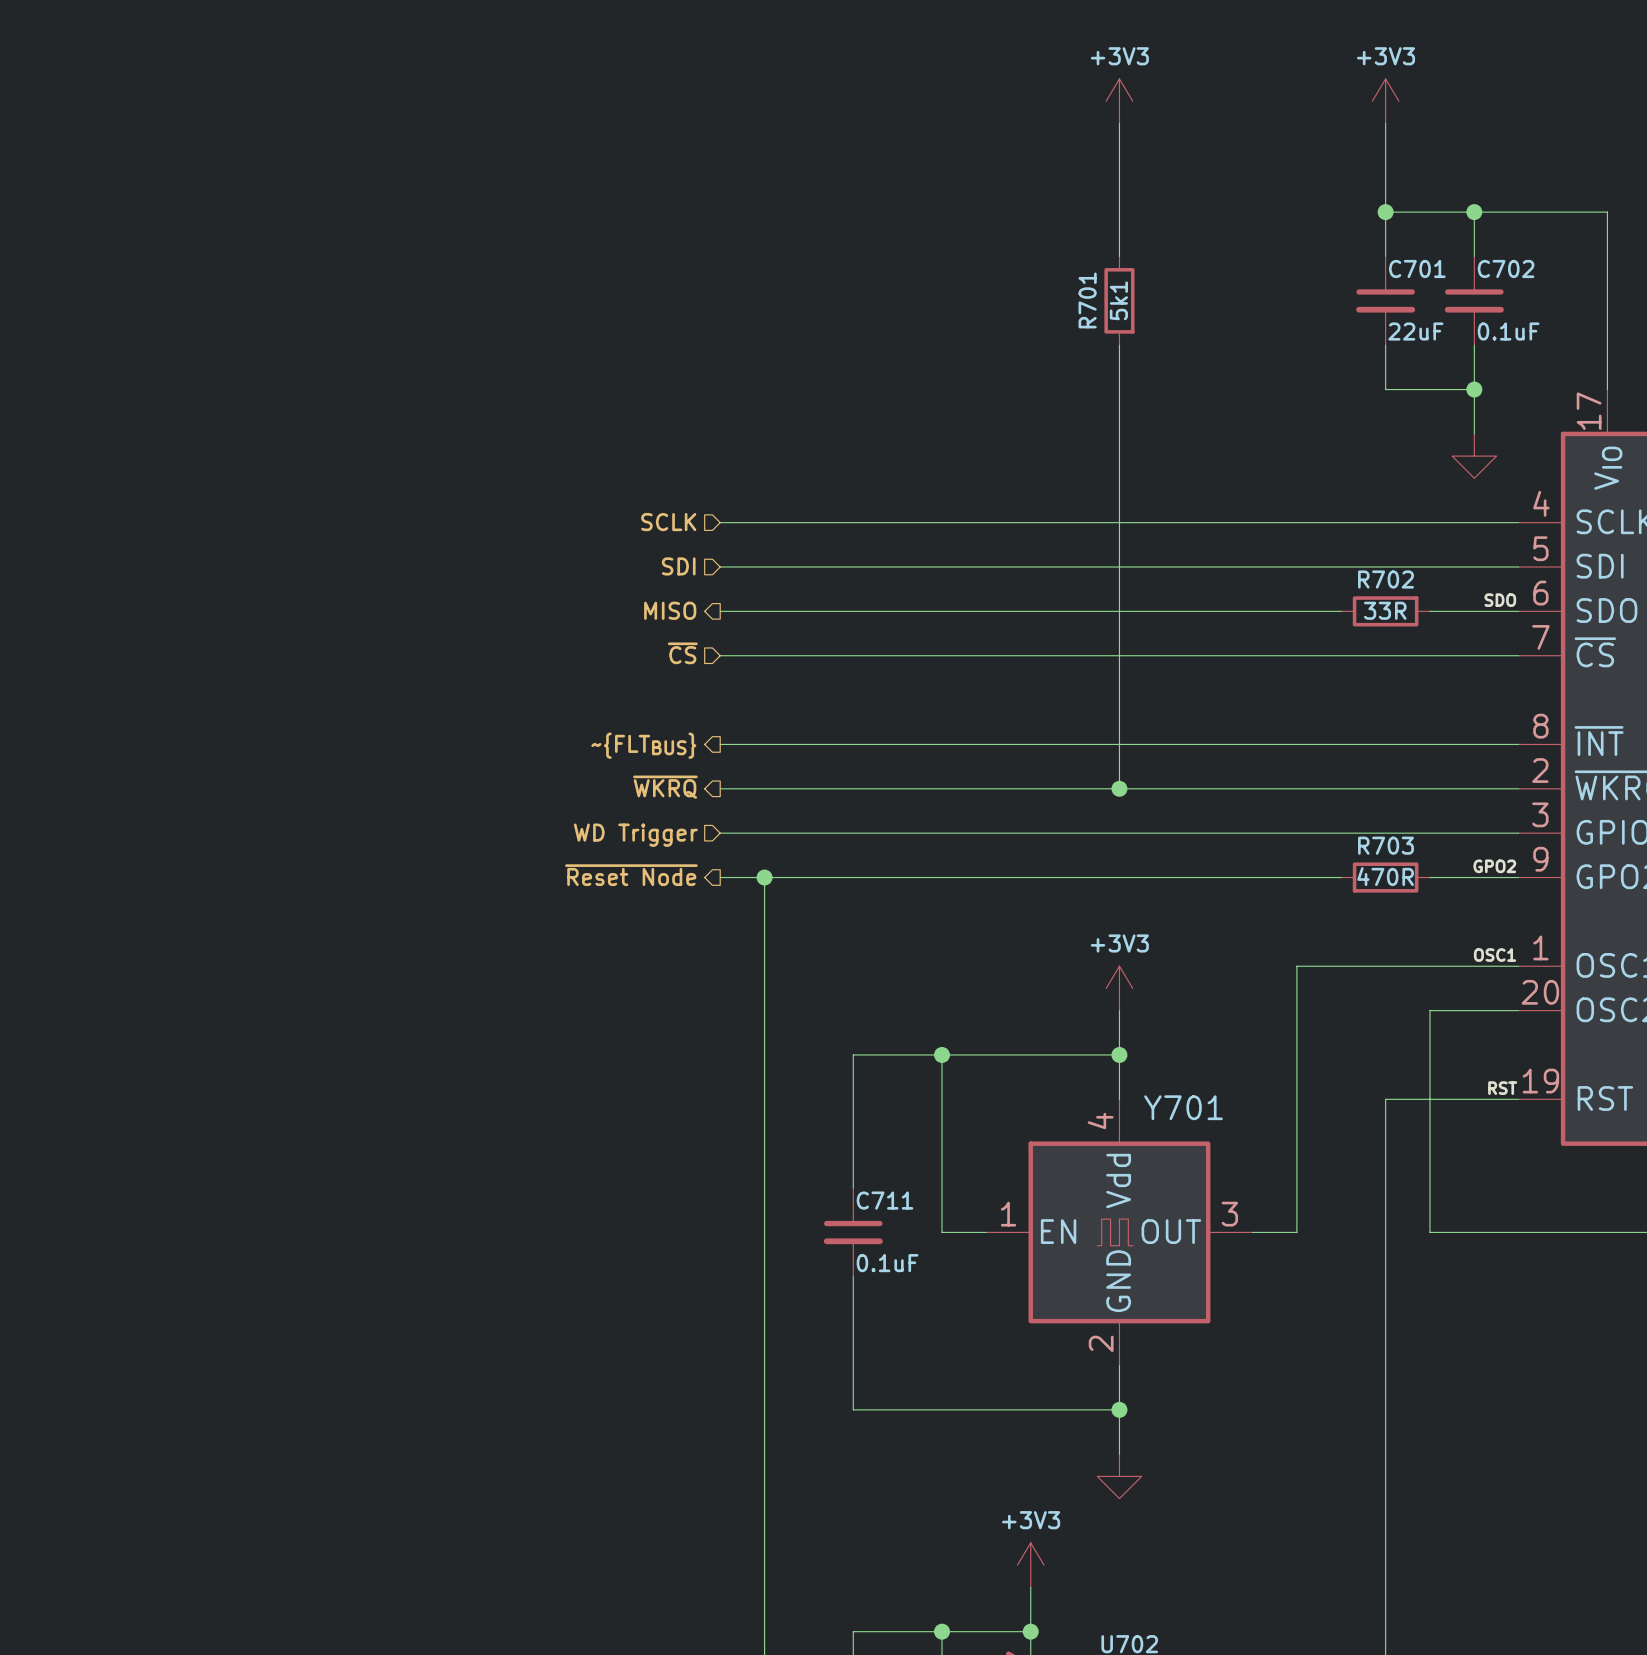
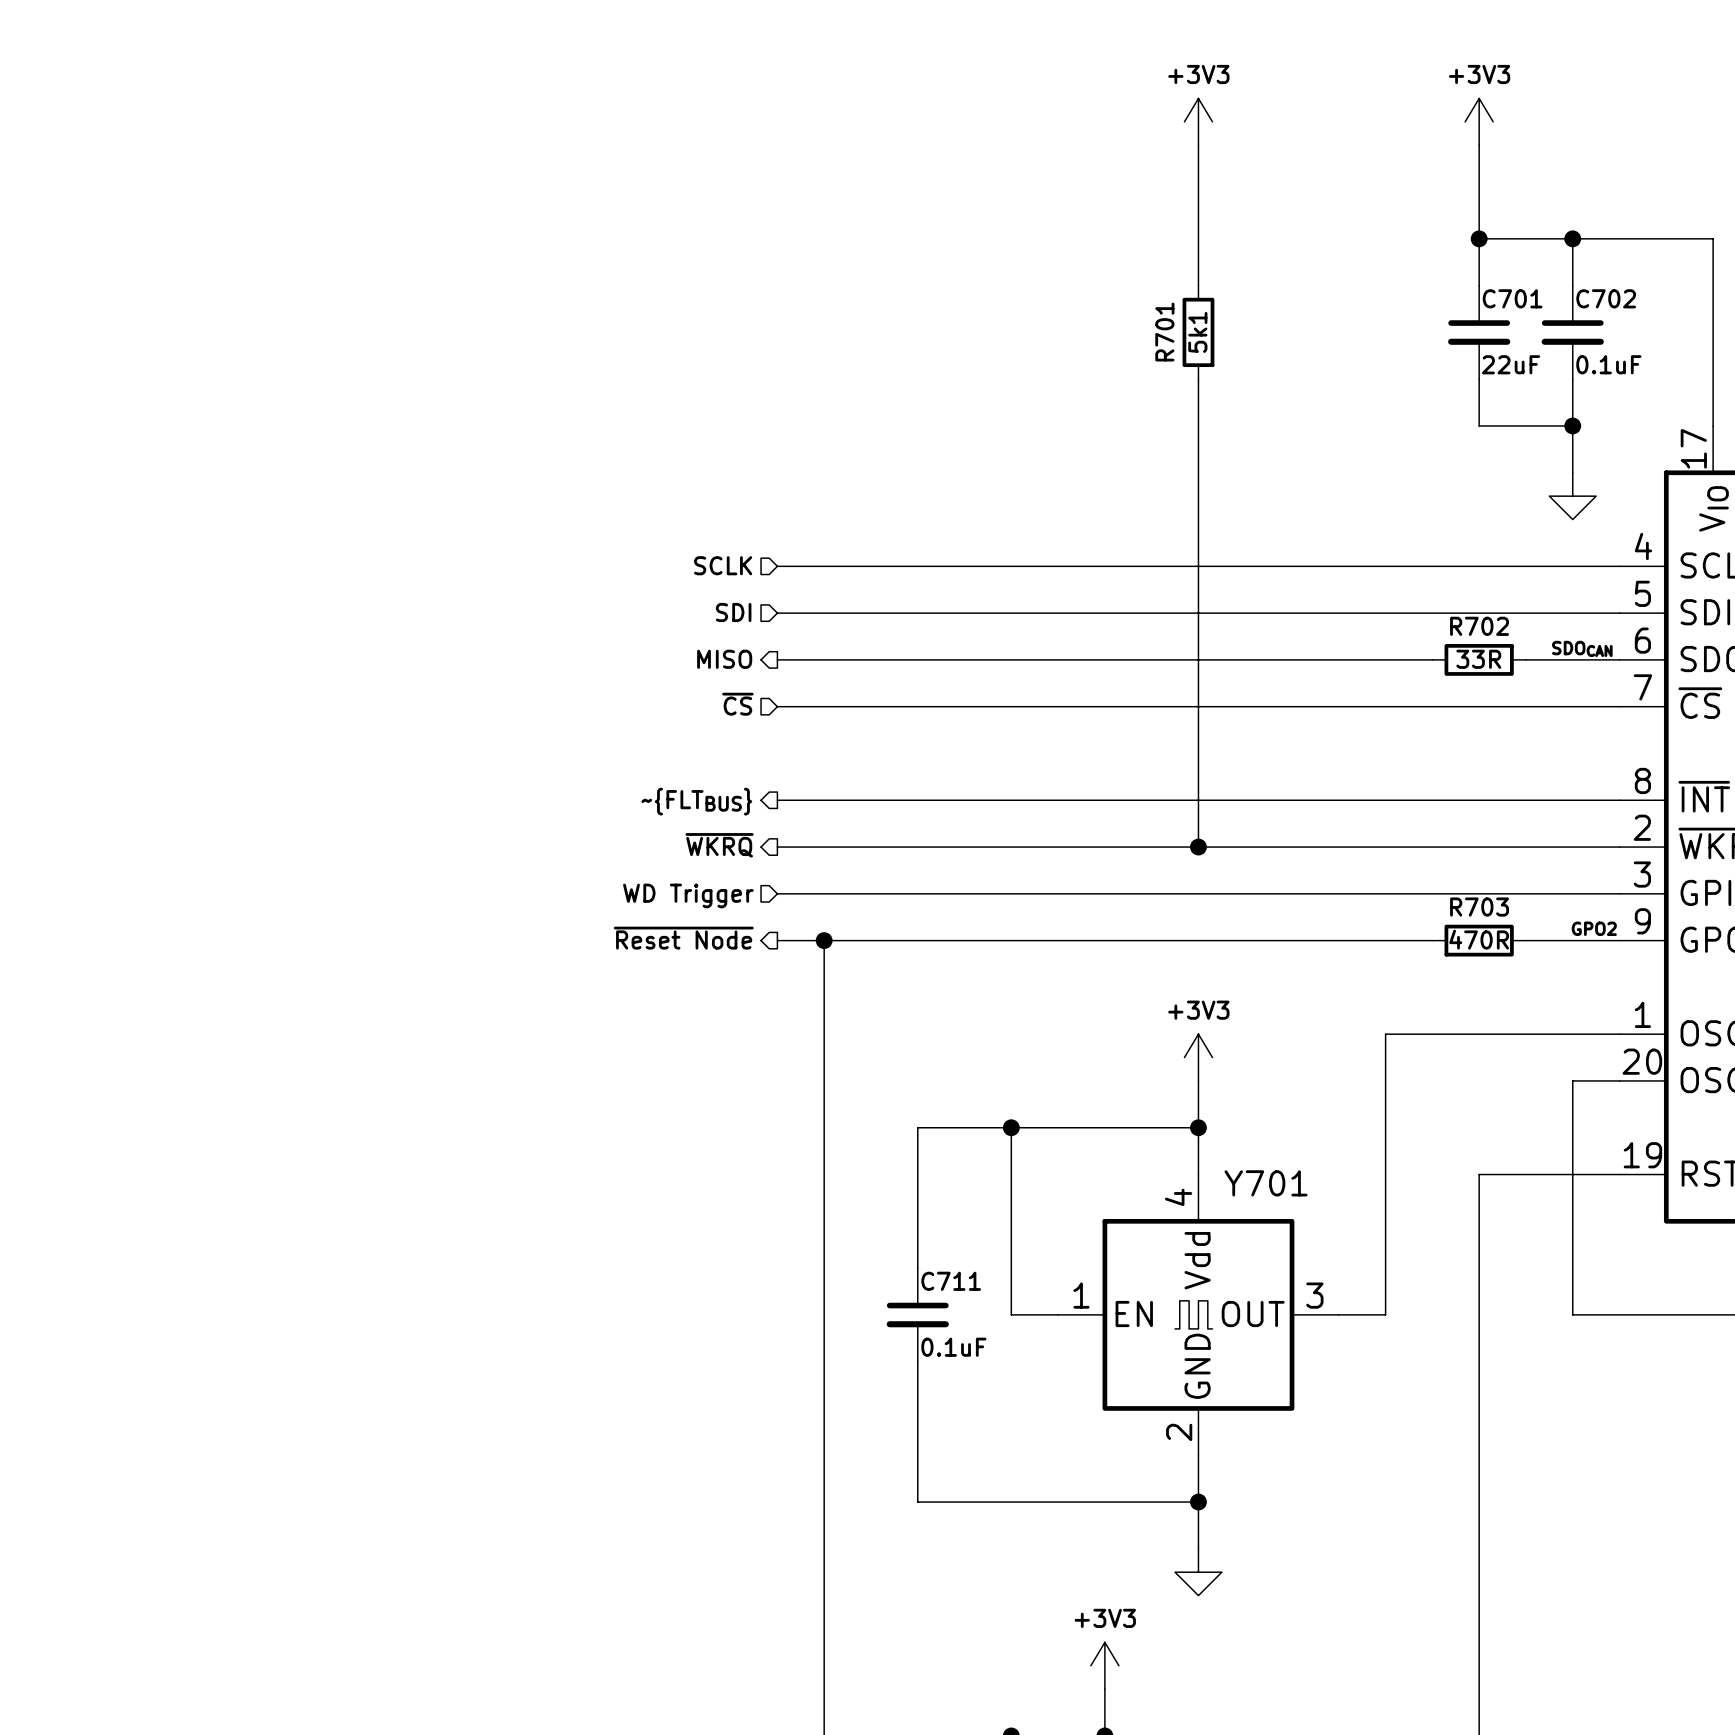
label: none -> SDOCAN (1582, 648)
label: SDO (1500, 600) -> none
label: OSC1 (1495, 955) -> none
wire: (1474, 1010) (1429, 1010) (1429, 1232) (1474, 1232) -> (1572, 1080) (1572, 1314)
label: RST (1502, 1088) -> none

